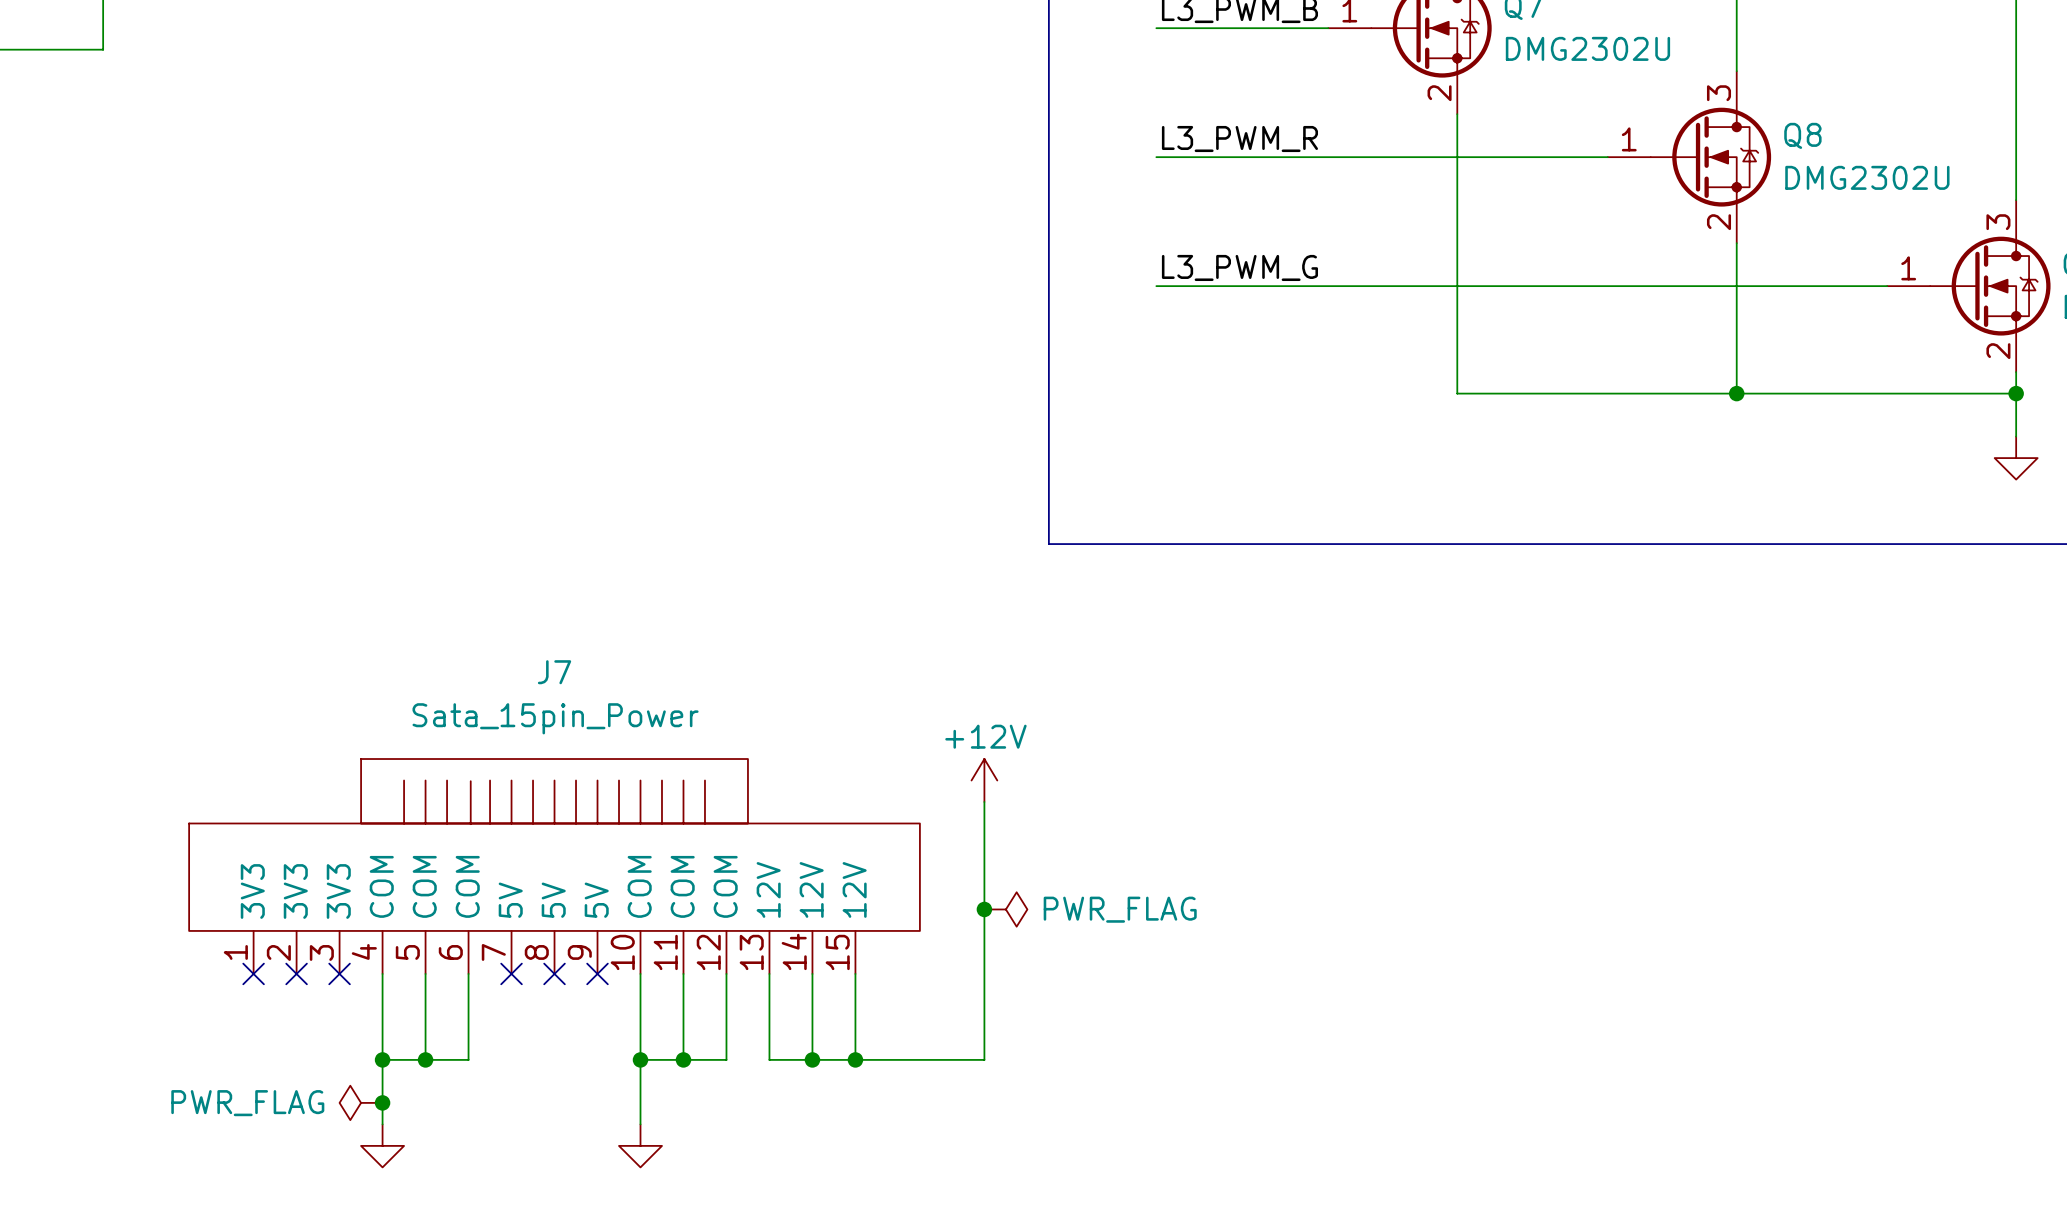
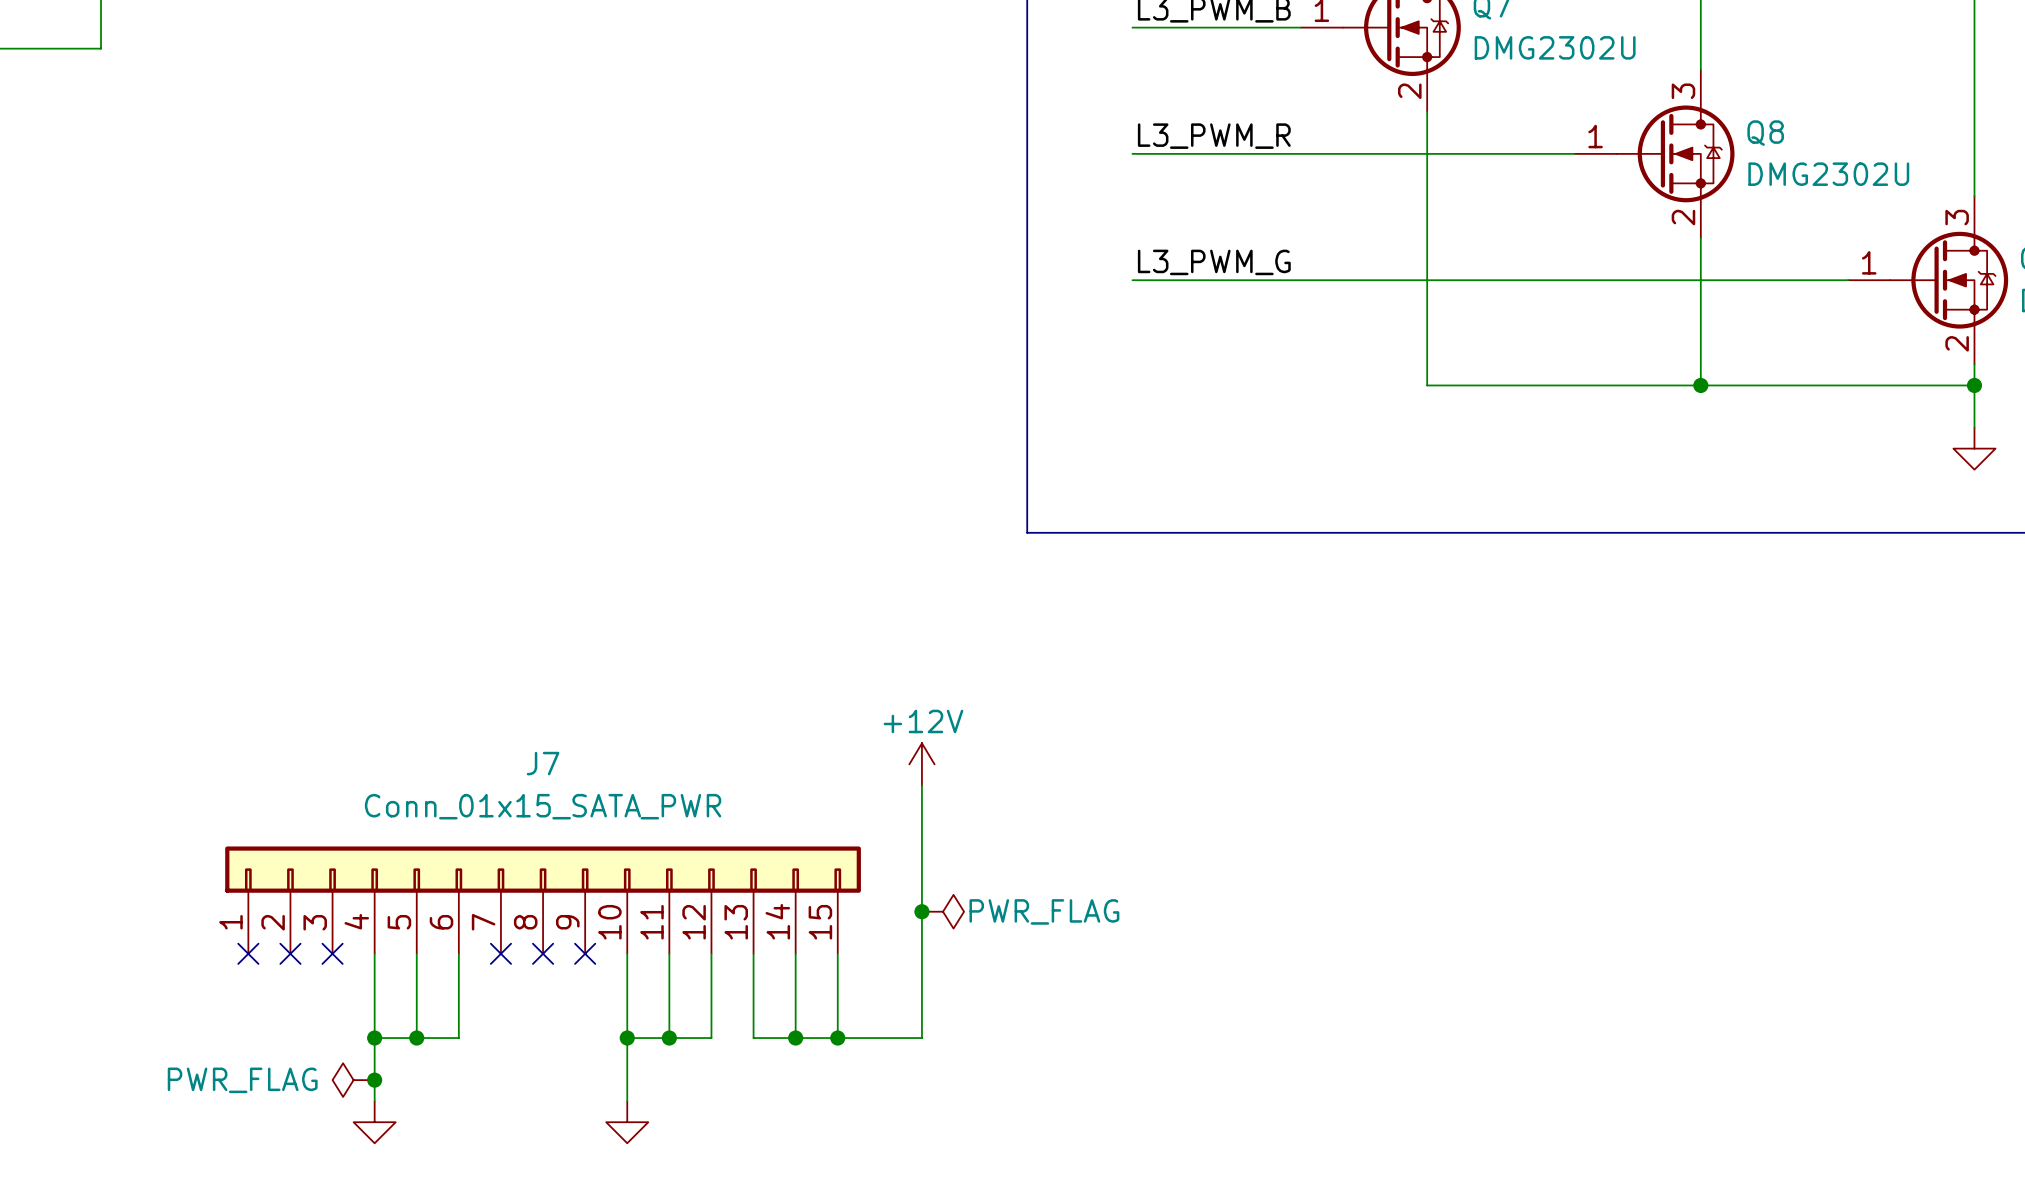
J7 name position: J7 (554, 672) -> J7 (543, 763)
J7 value: Sata_15pin_Power (555, 718) -> Conn_01x15_SATA_PWR (543, 806)
J7 symbol: [189, 759, 920, 974] -> [225, 846, 861, 954]
power symbol position: +12V (984, 780) -> +12V (921, 764)
wire: (984, 801) (984, 1059) (941, 1059) -> (921, 785) (921, 1038)
junction position: (984, 909) -> (921, 911)
power symbol position: PWR_FLAG (1005, 909) -> PWR_FLAG (943, 911)
power symbol text position: PWR_FLAG (1120, 909) -> PWR_FLAG (1044, 911)

